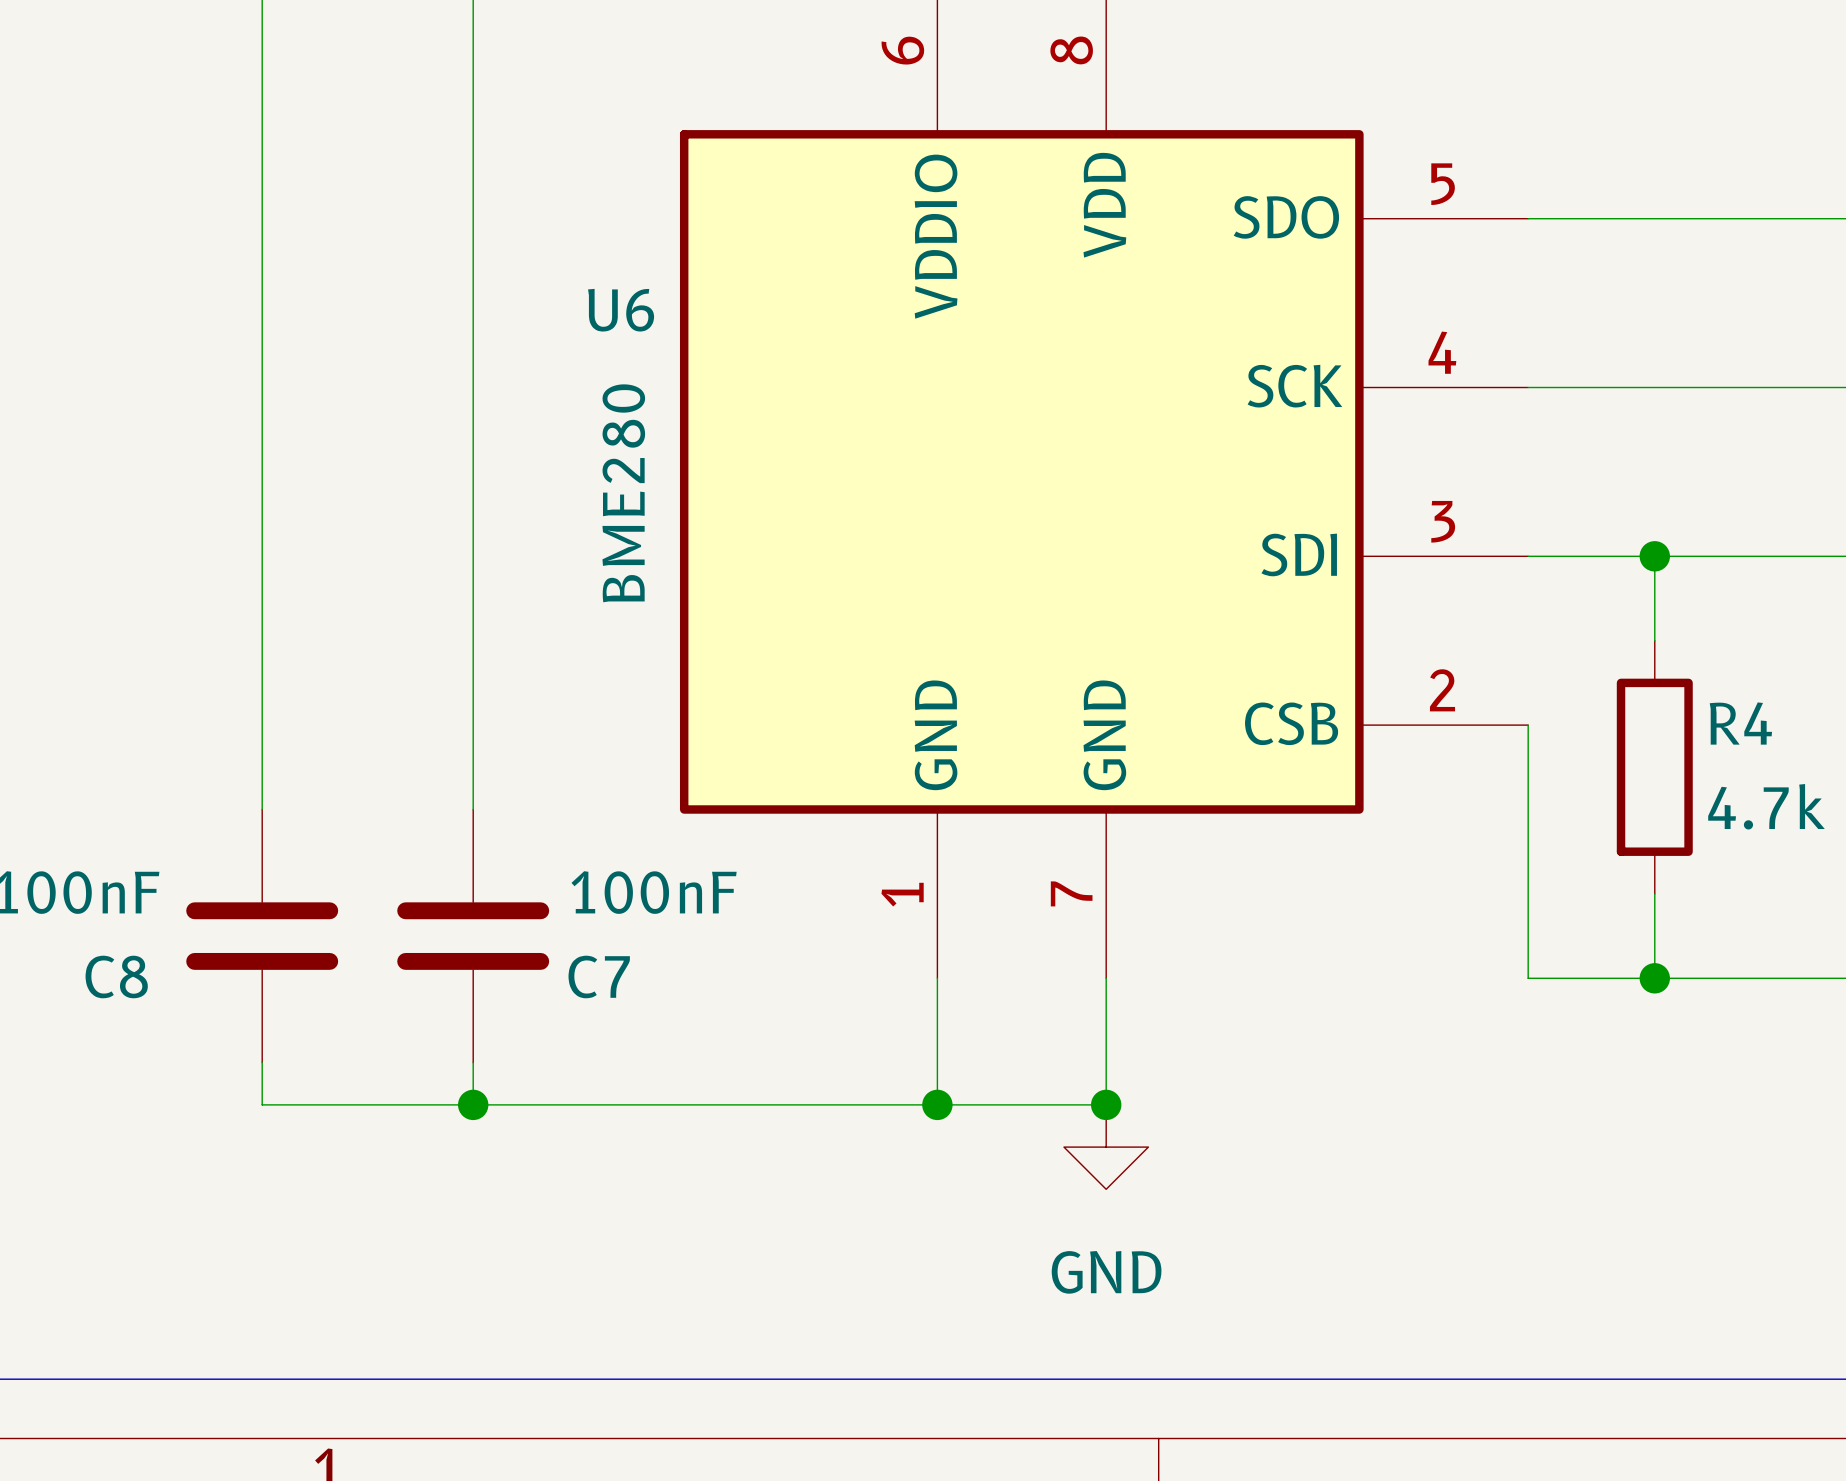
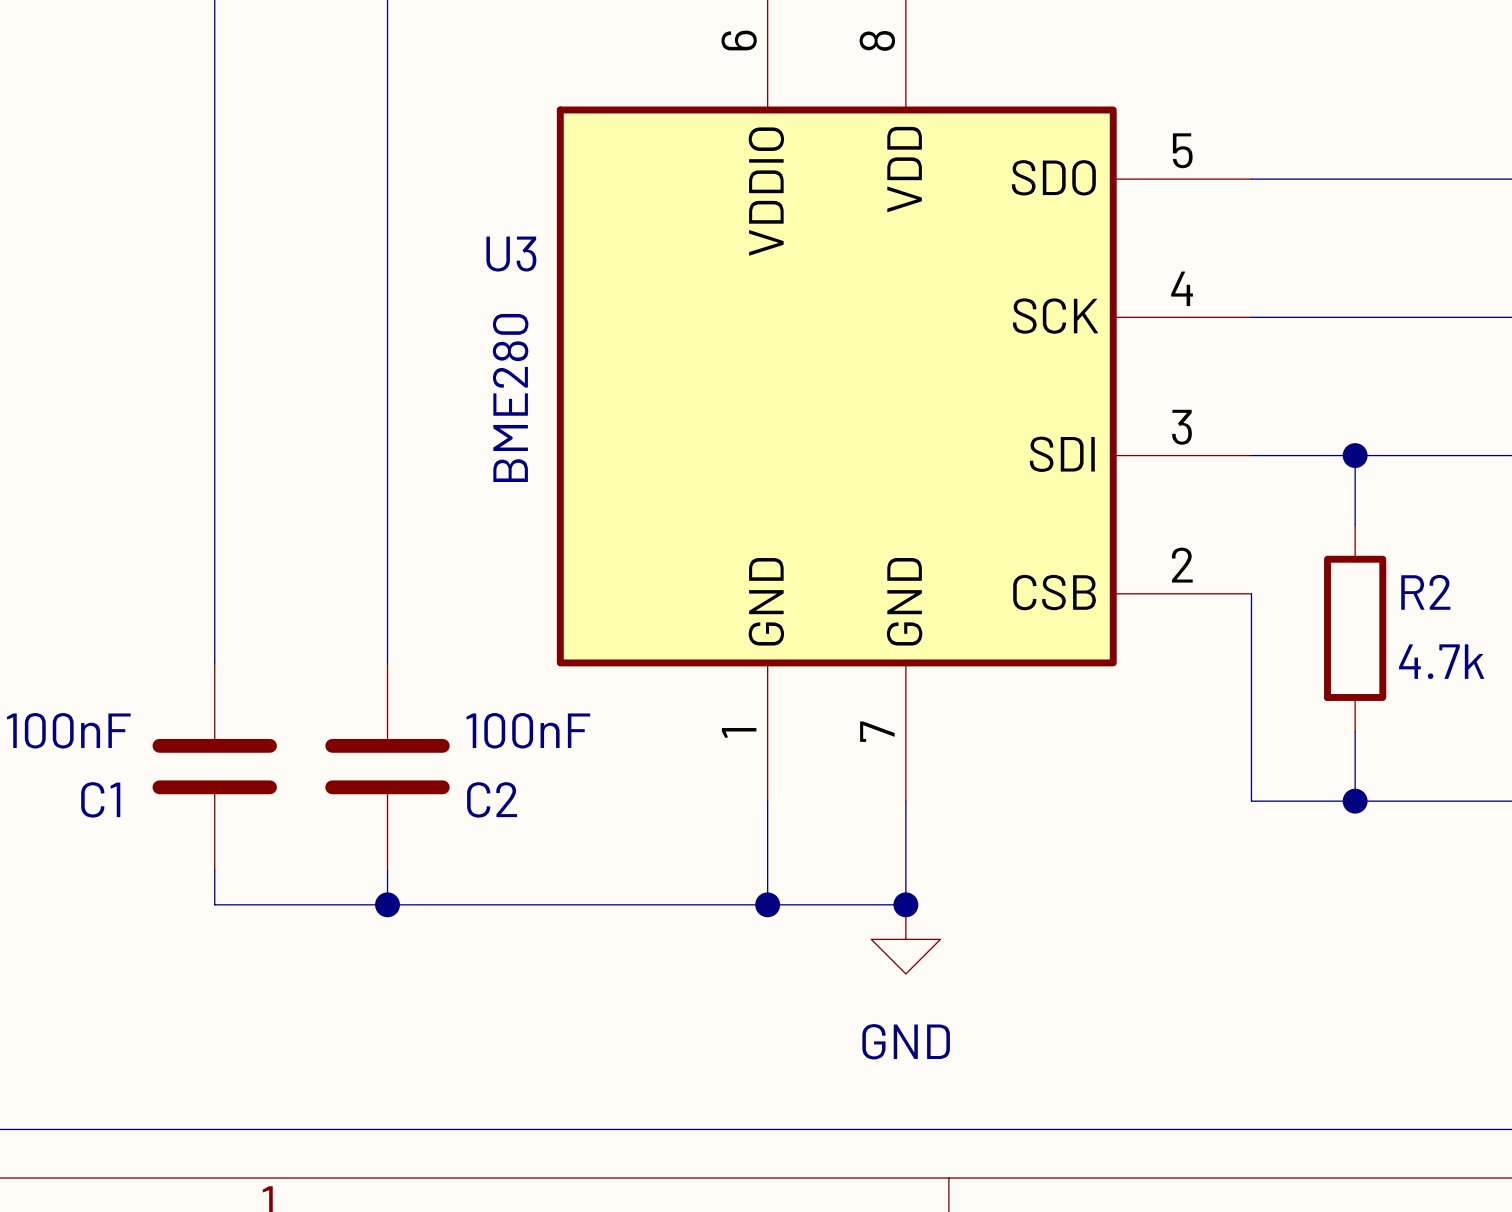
U6 name: U6 (621, 310) -> U3 (511, 254)
R4 name: R4 (1740, 723) -> R2 (1425, 592)
C8 name: C8 (116, 976) -> C1 (100, 799)
C7 name: C7 (599, 976) -> C2 (492, 799)

